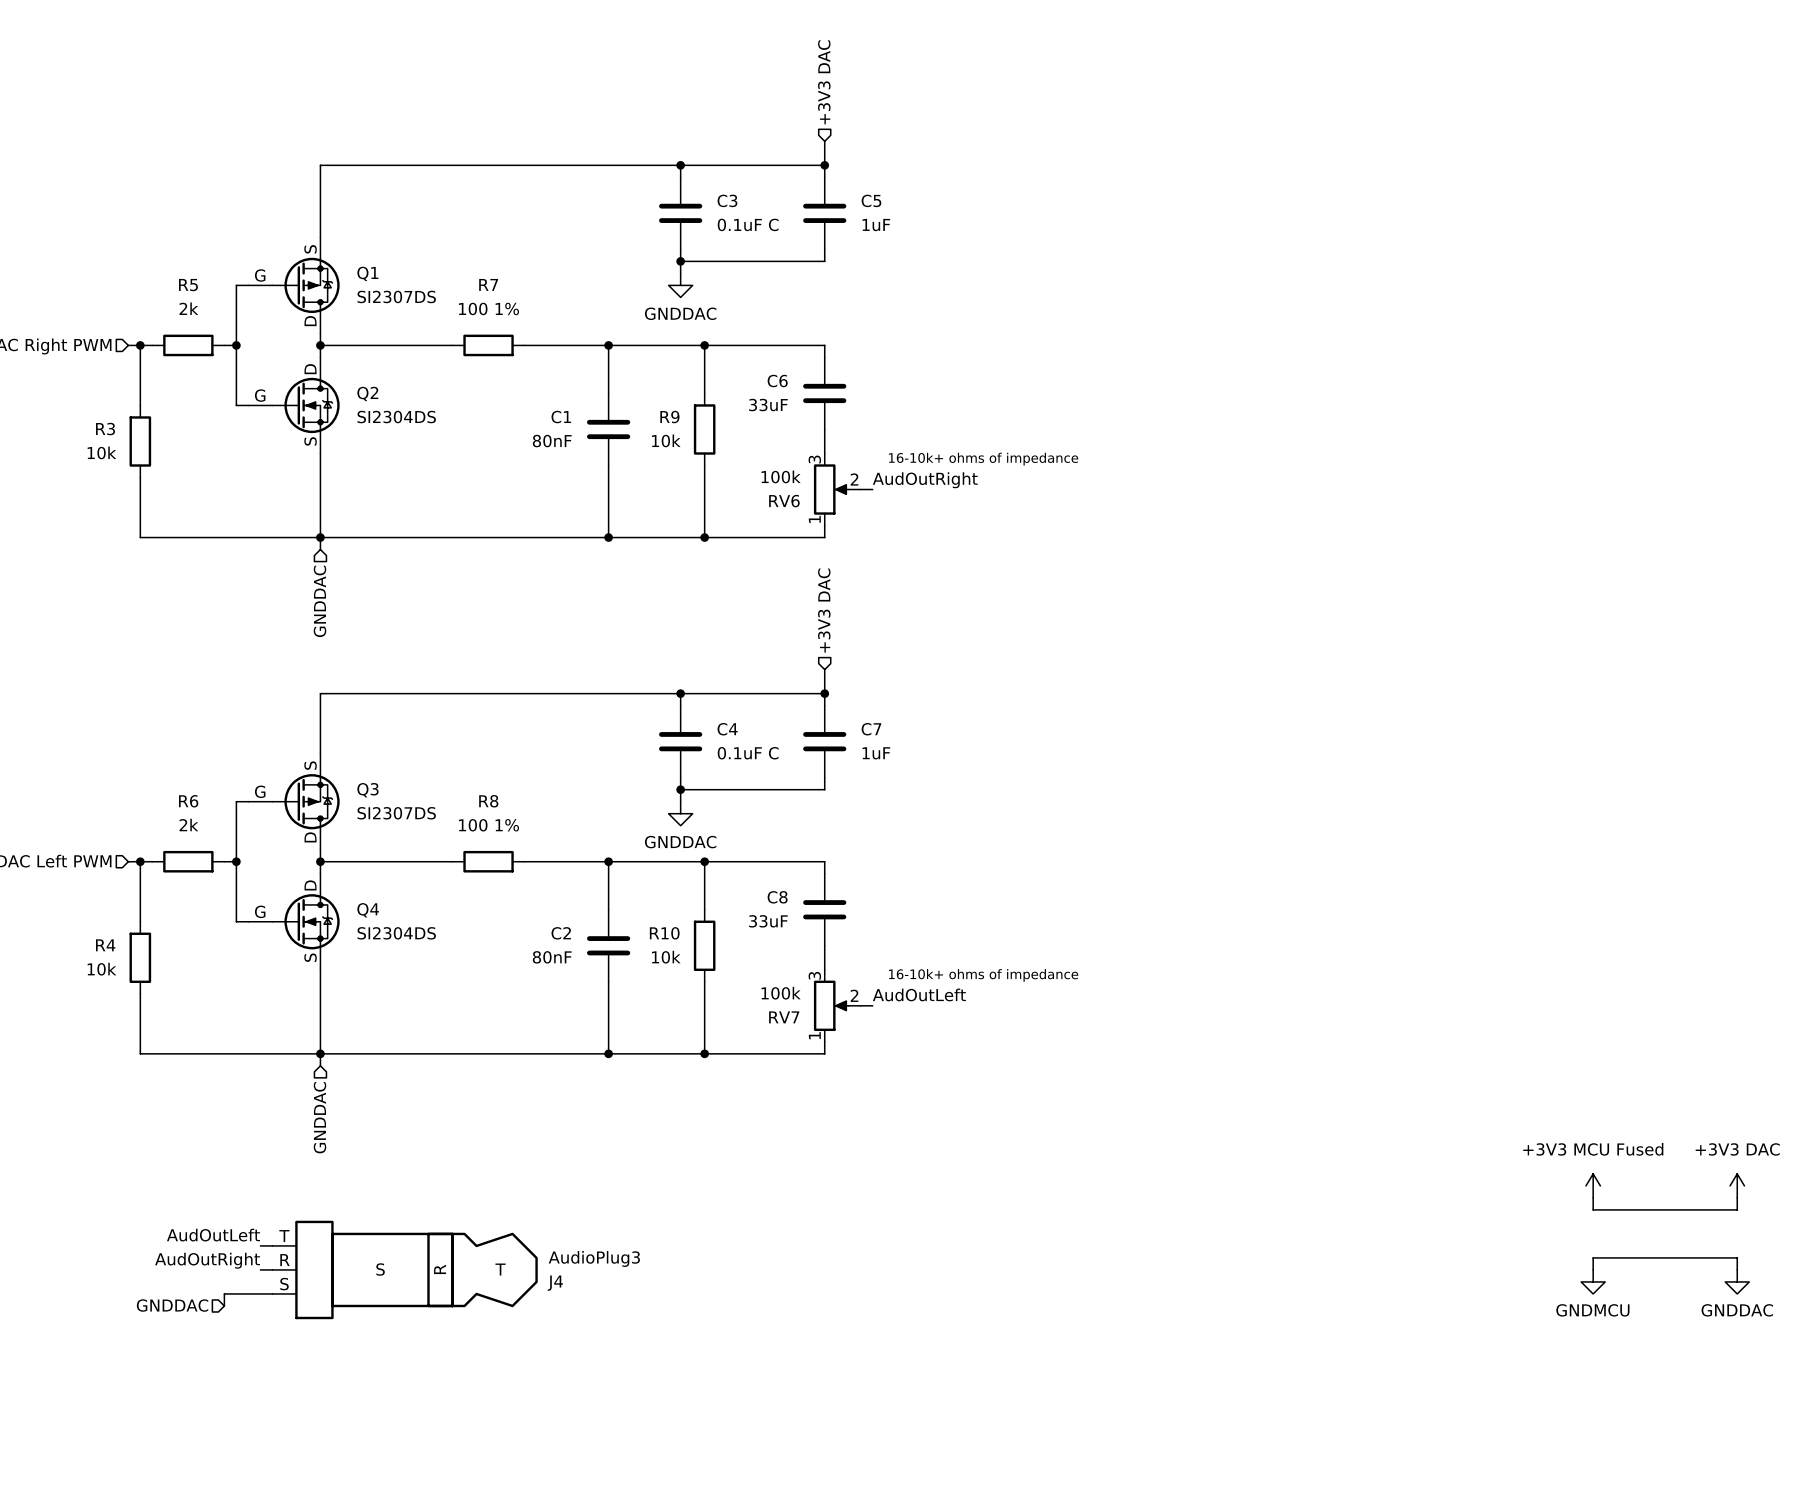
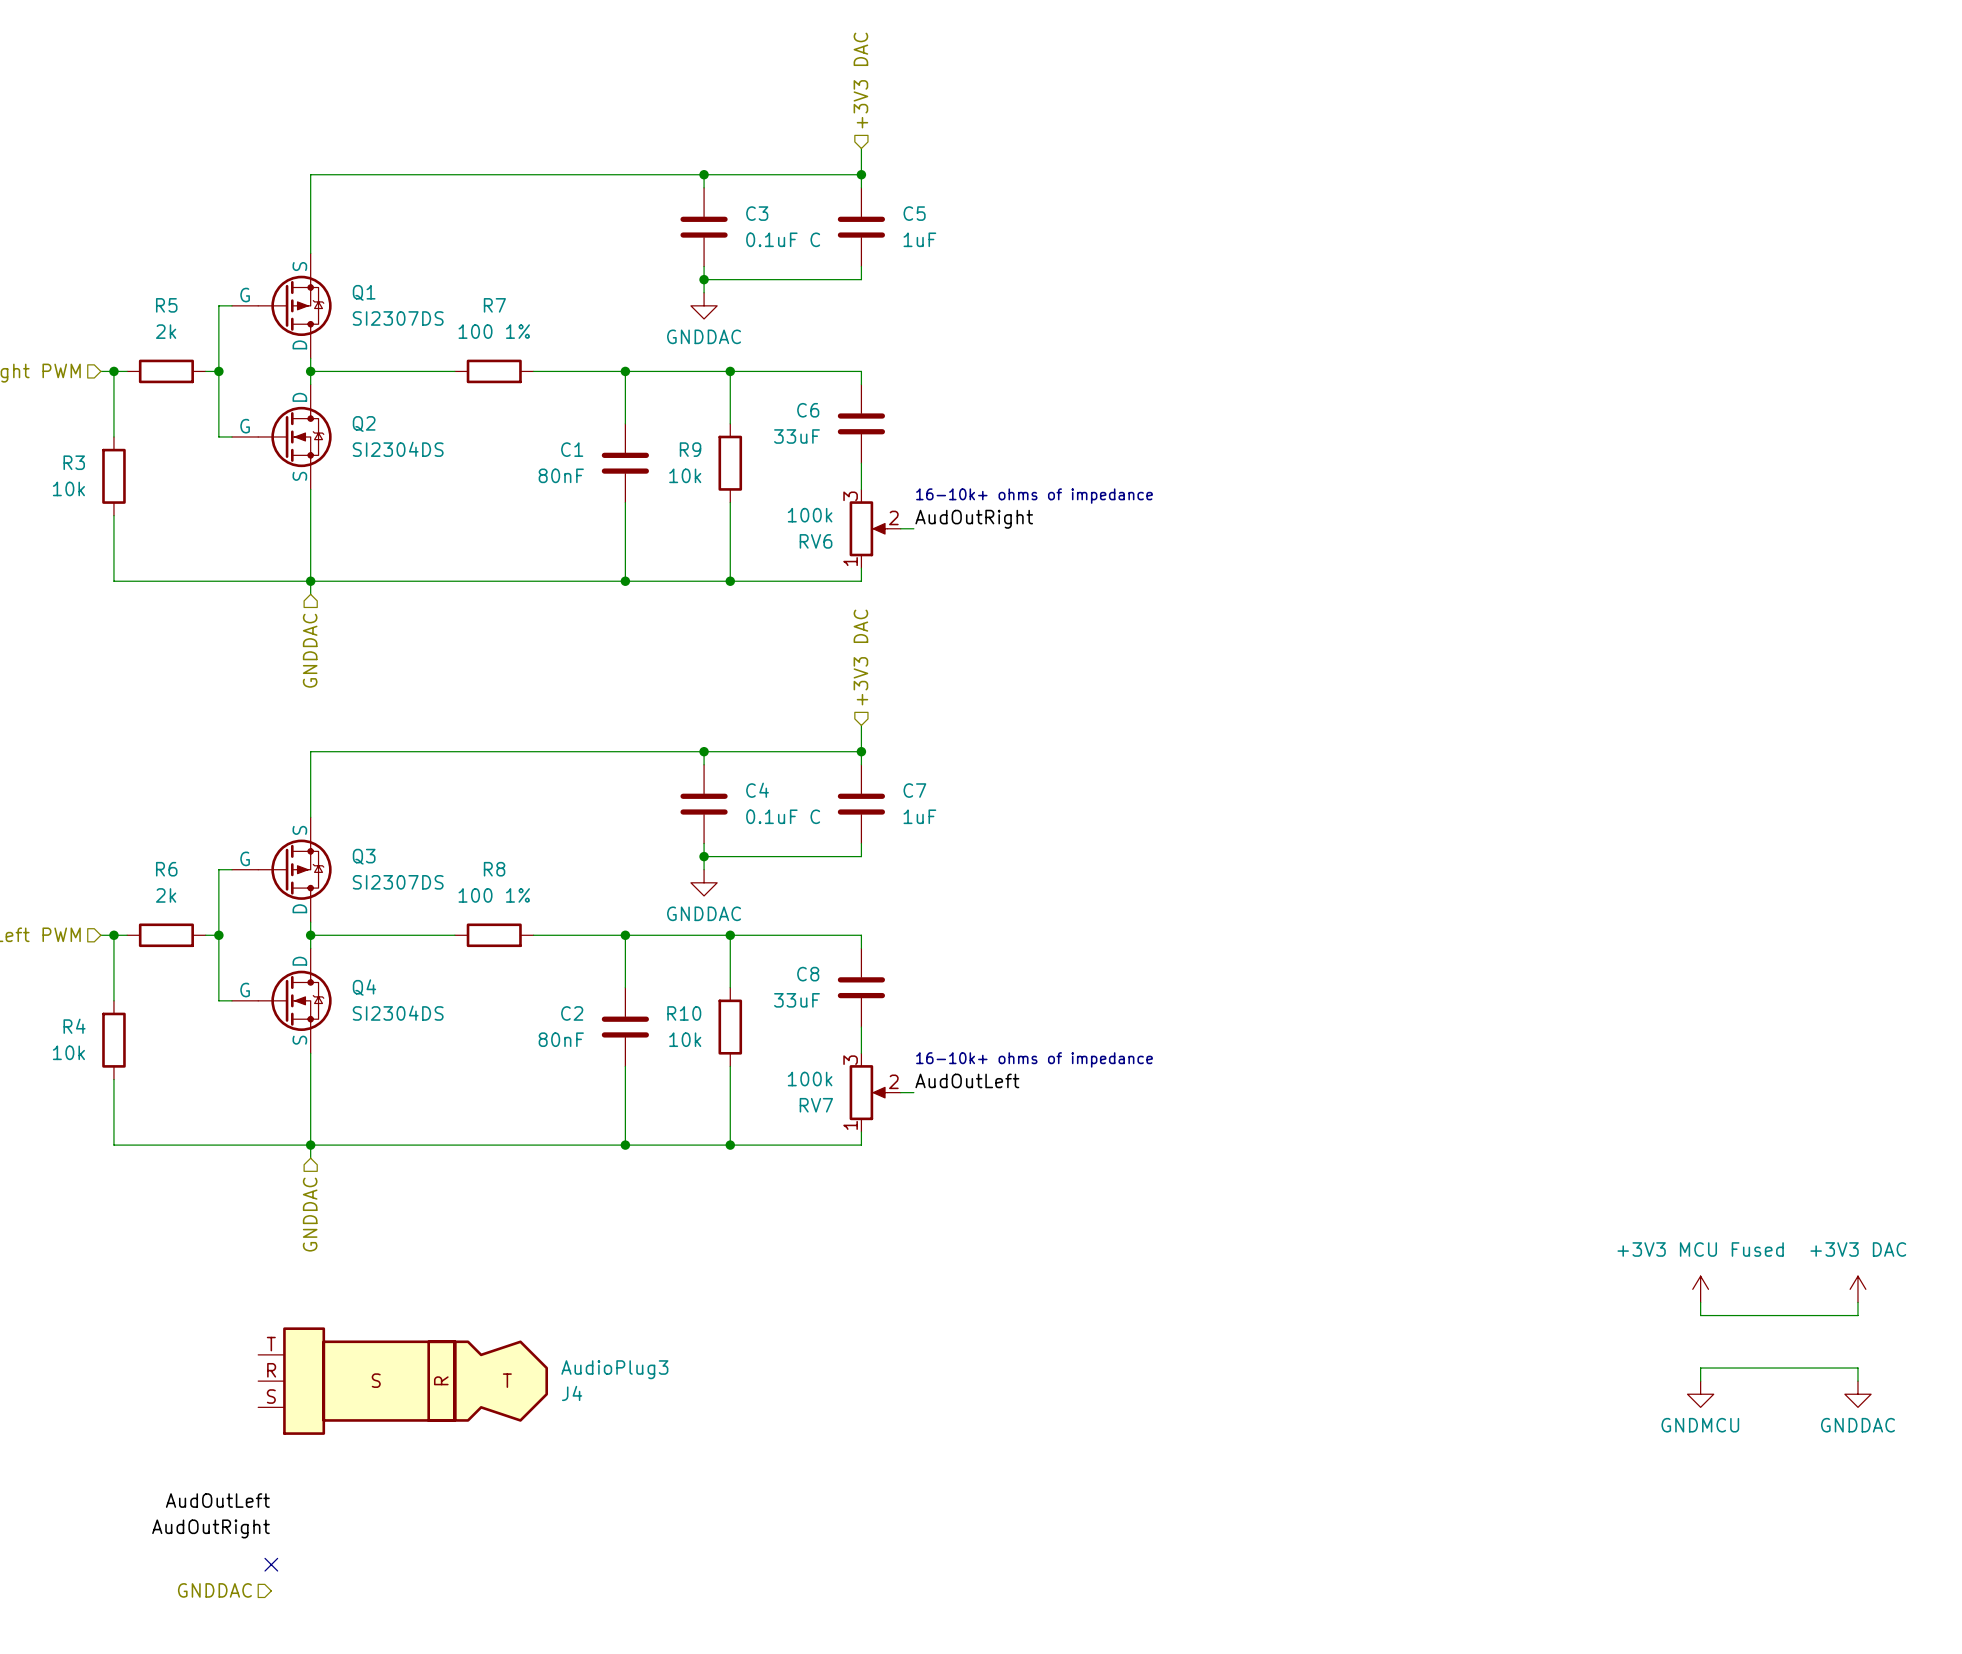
label position: AudOutLeft (213, 1235) -> AudOutLeft (217, 1500)
wire: (260, 1245) (272, 1245) -> none
label position: AudOutRight (207, 1260) -> AudOutRight (210, 1528)
wire: (260, 1269) (272, 1269) -> none
wire: (272, 1293) (224, 1293) (224, 1305) -> none
hierarchical label position: GNDDAC (172, 1305) -> GNDDAC (214, 1590)
no-connect mark: none -> (271, 1564)

